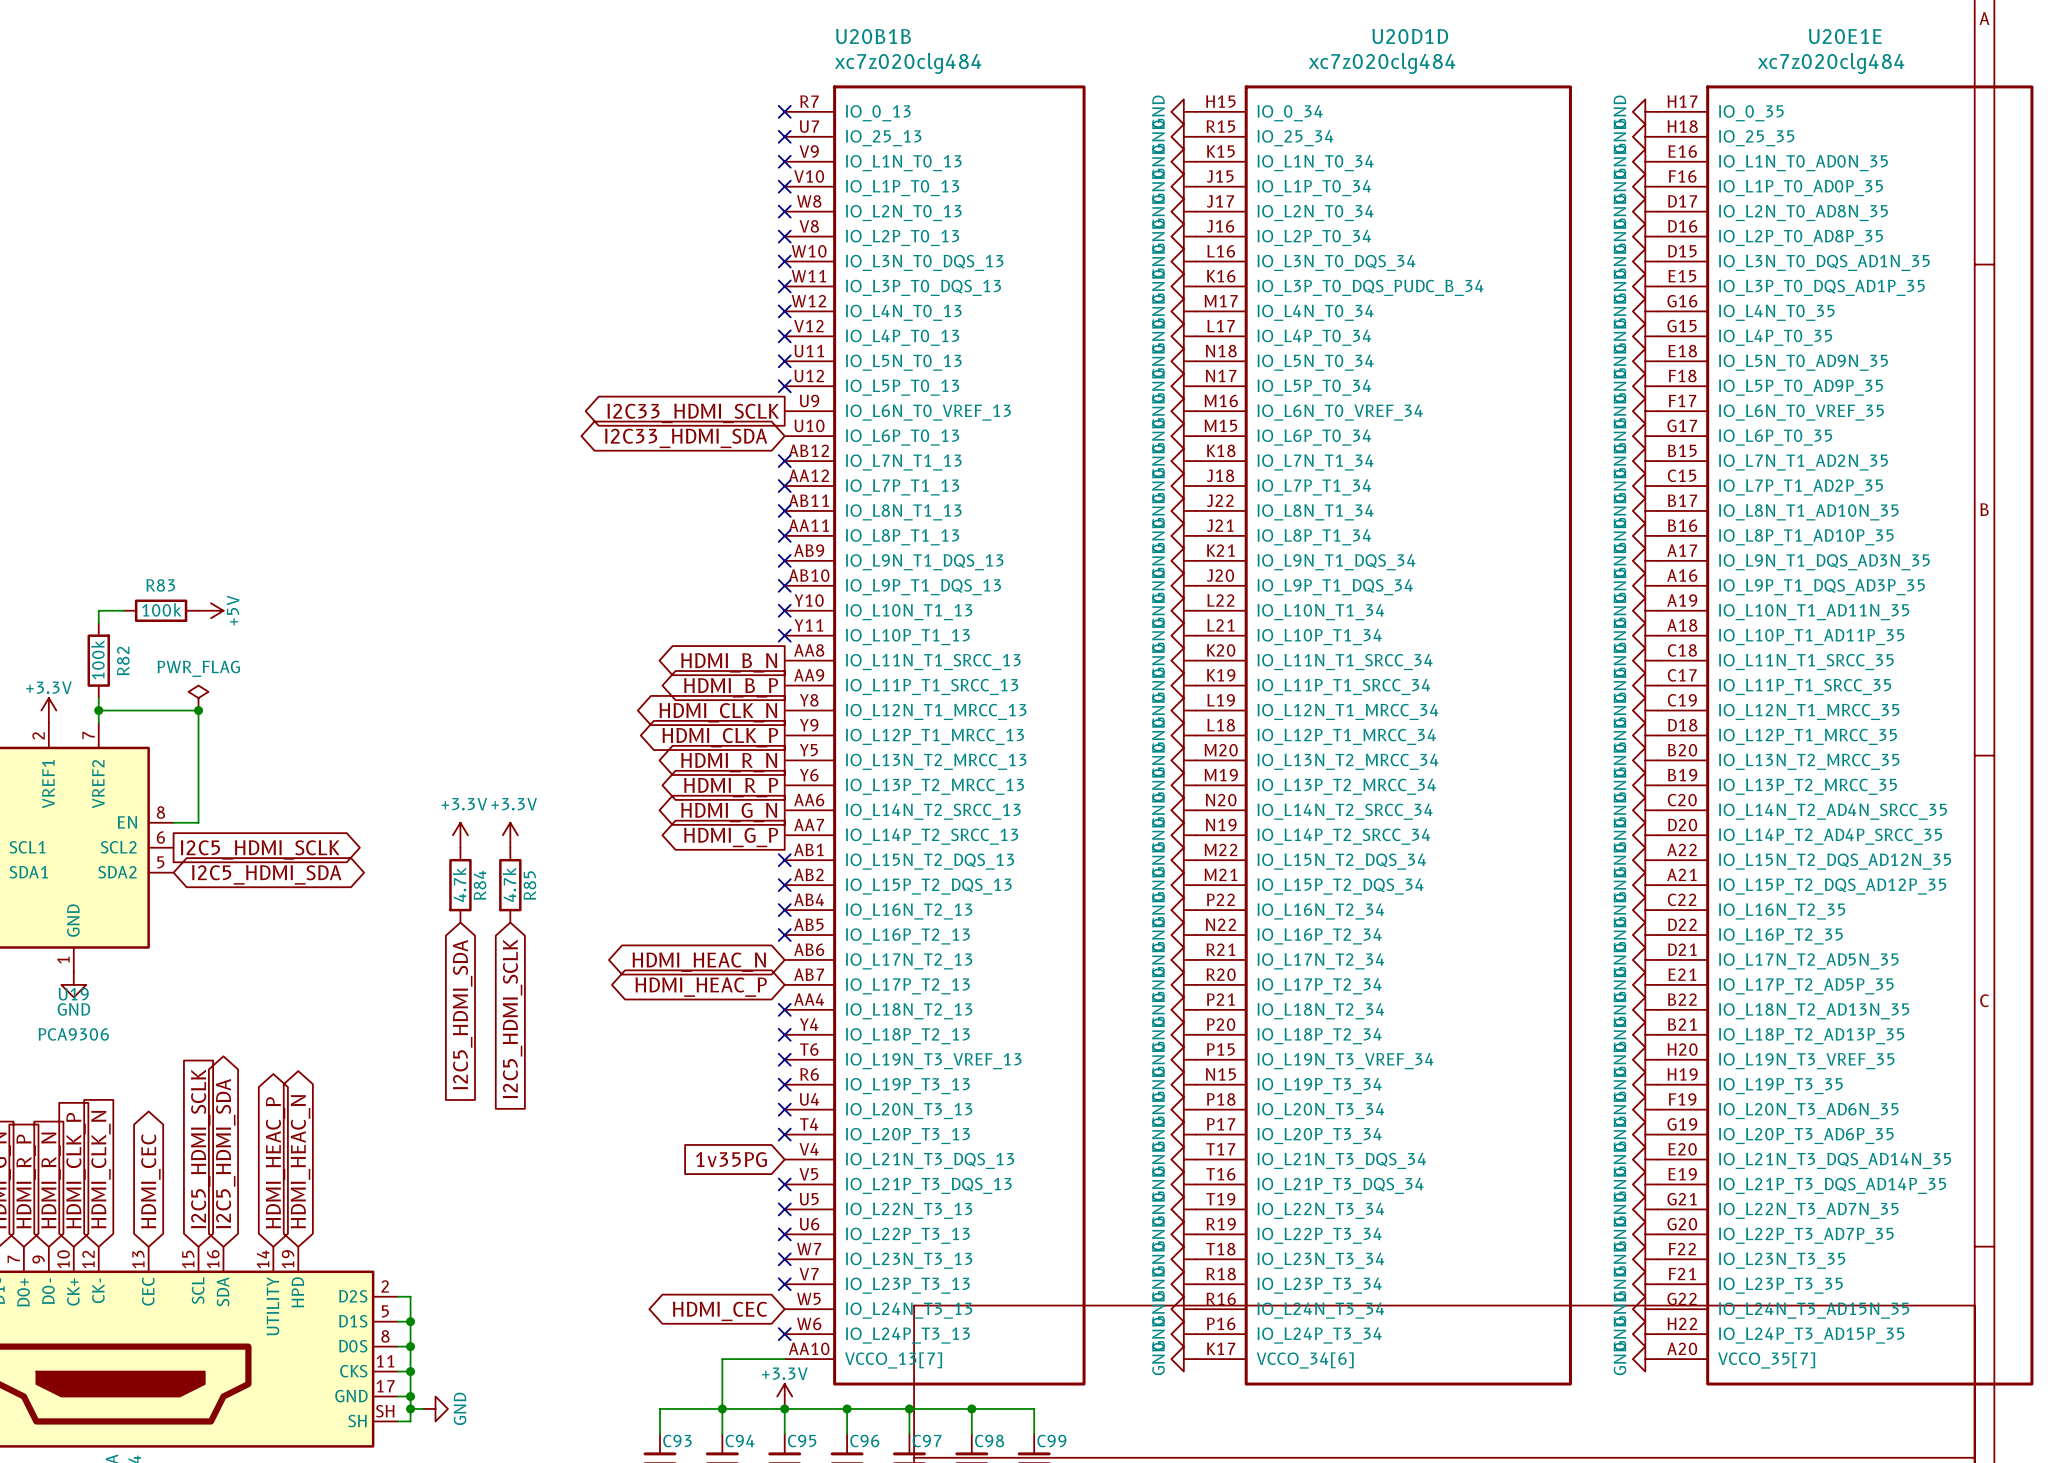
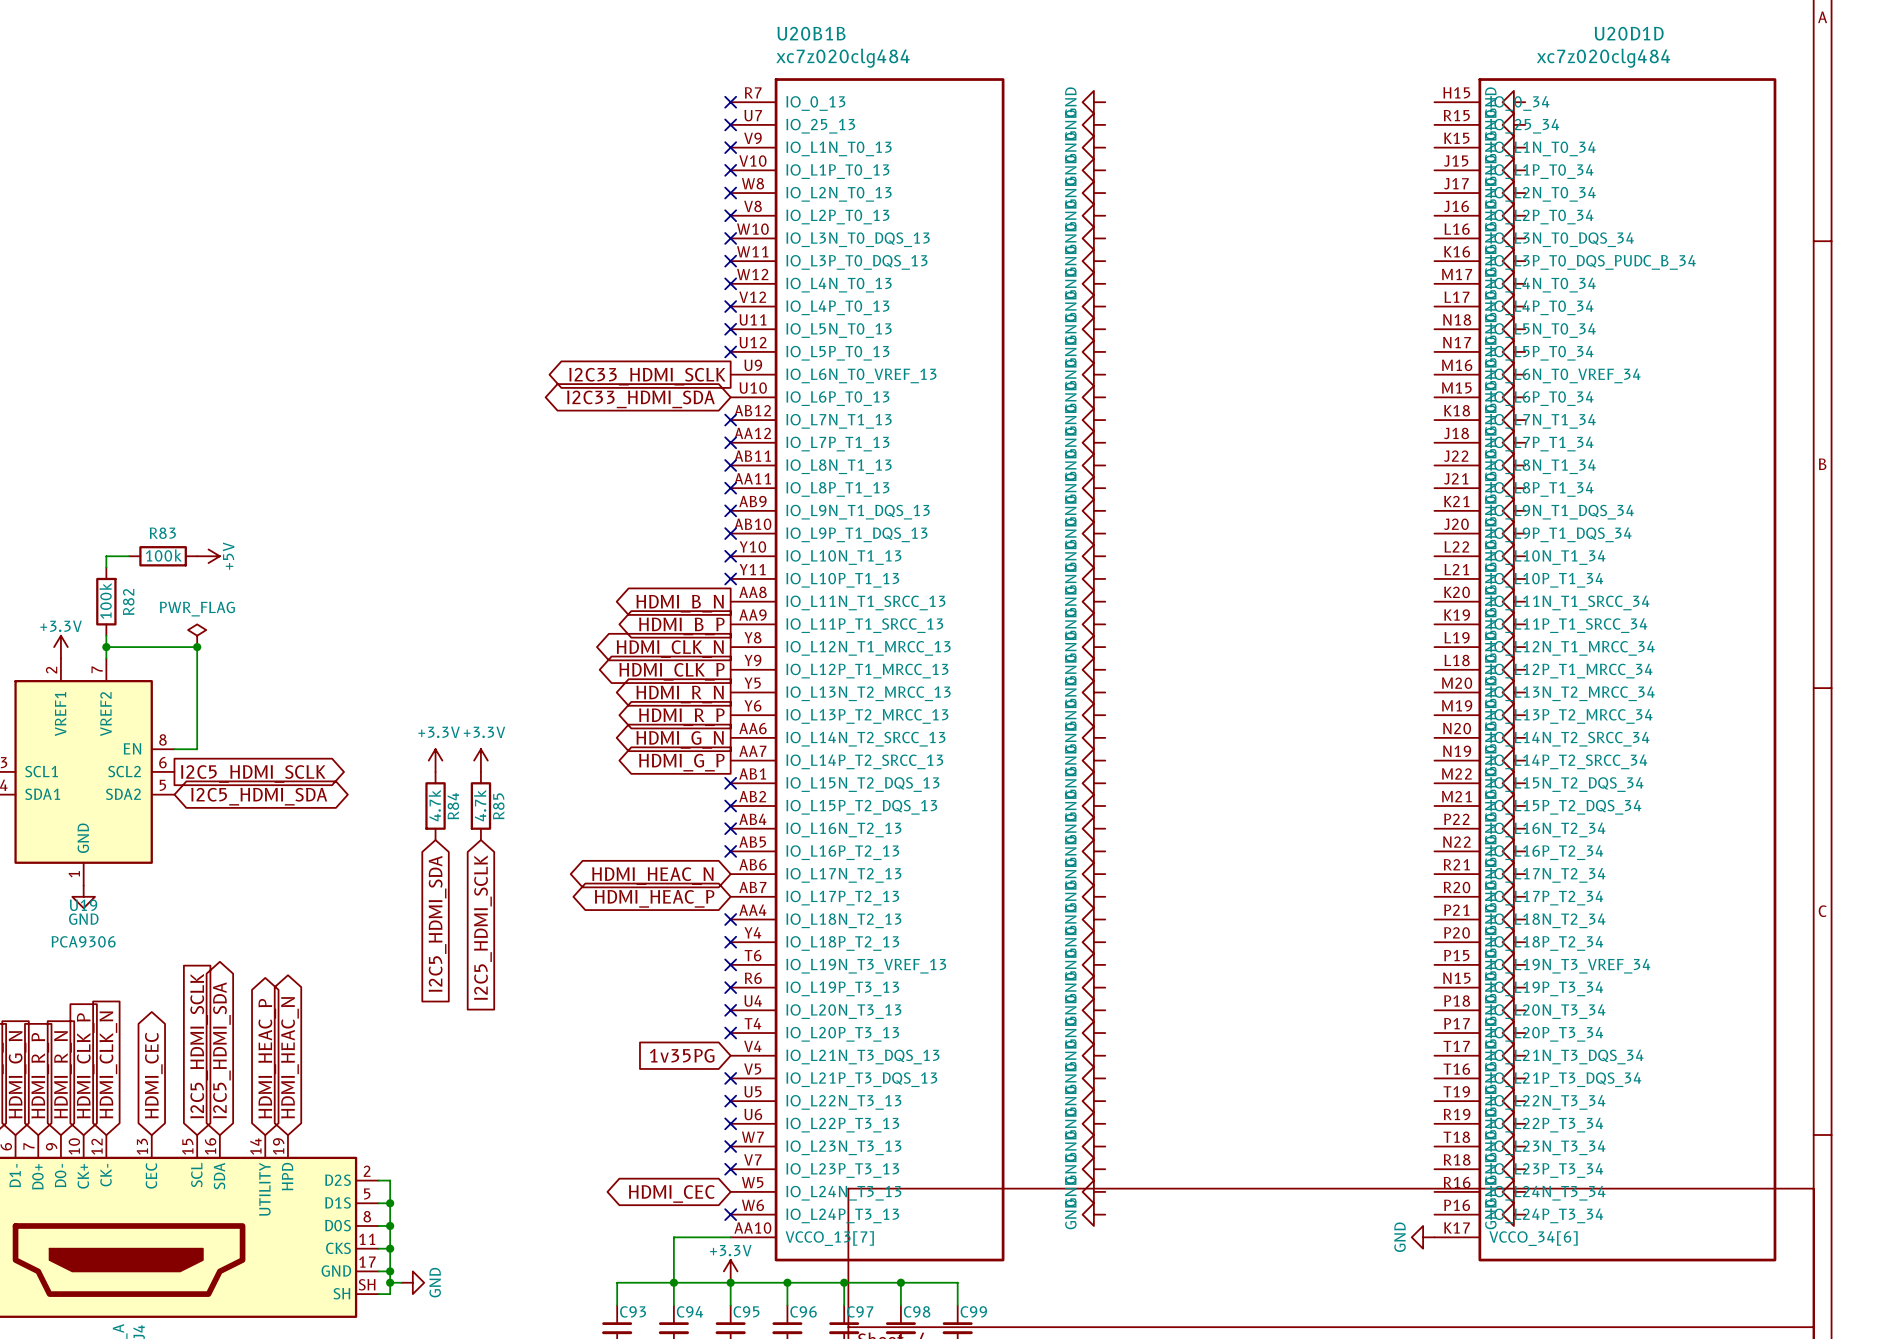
U20D1D position: (1384, 735) -> (1605, 669)
U20E1E: xc7z020clg484 (1845, 735) -> none
power symbol: GND (1183, 1359) -> none
power symbol position: GND (1645, 1359) -> GND (1423, 1237)

